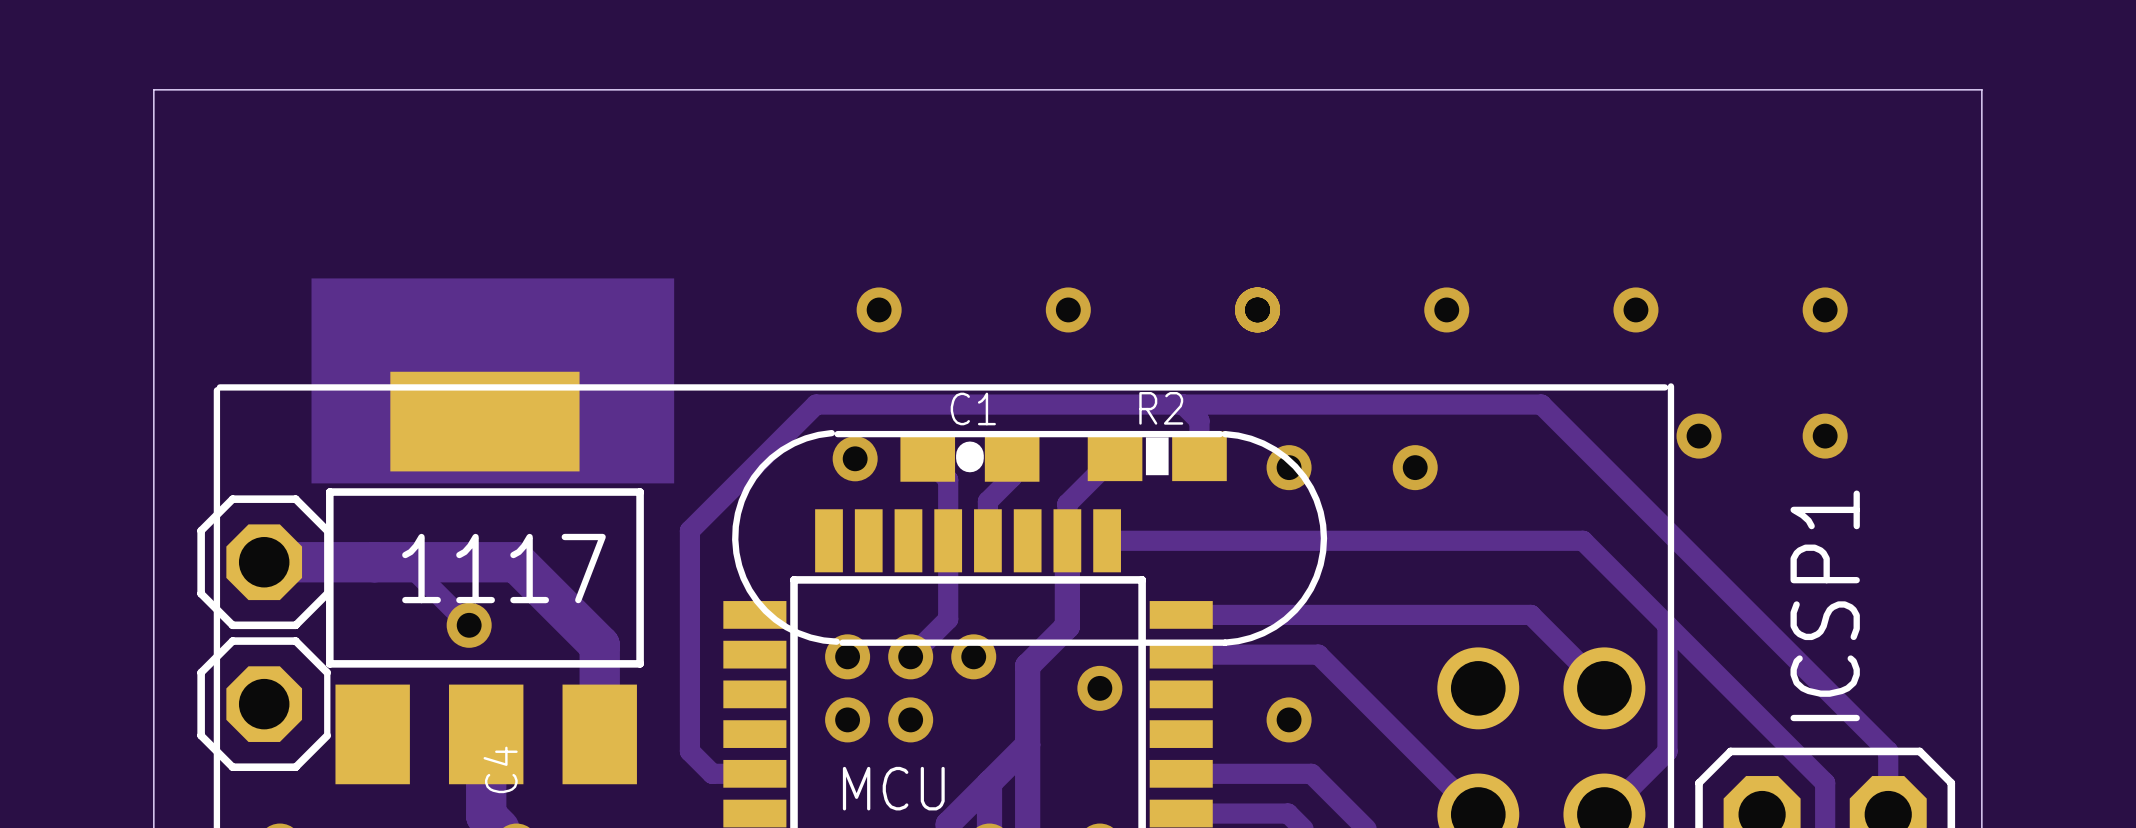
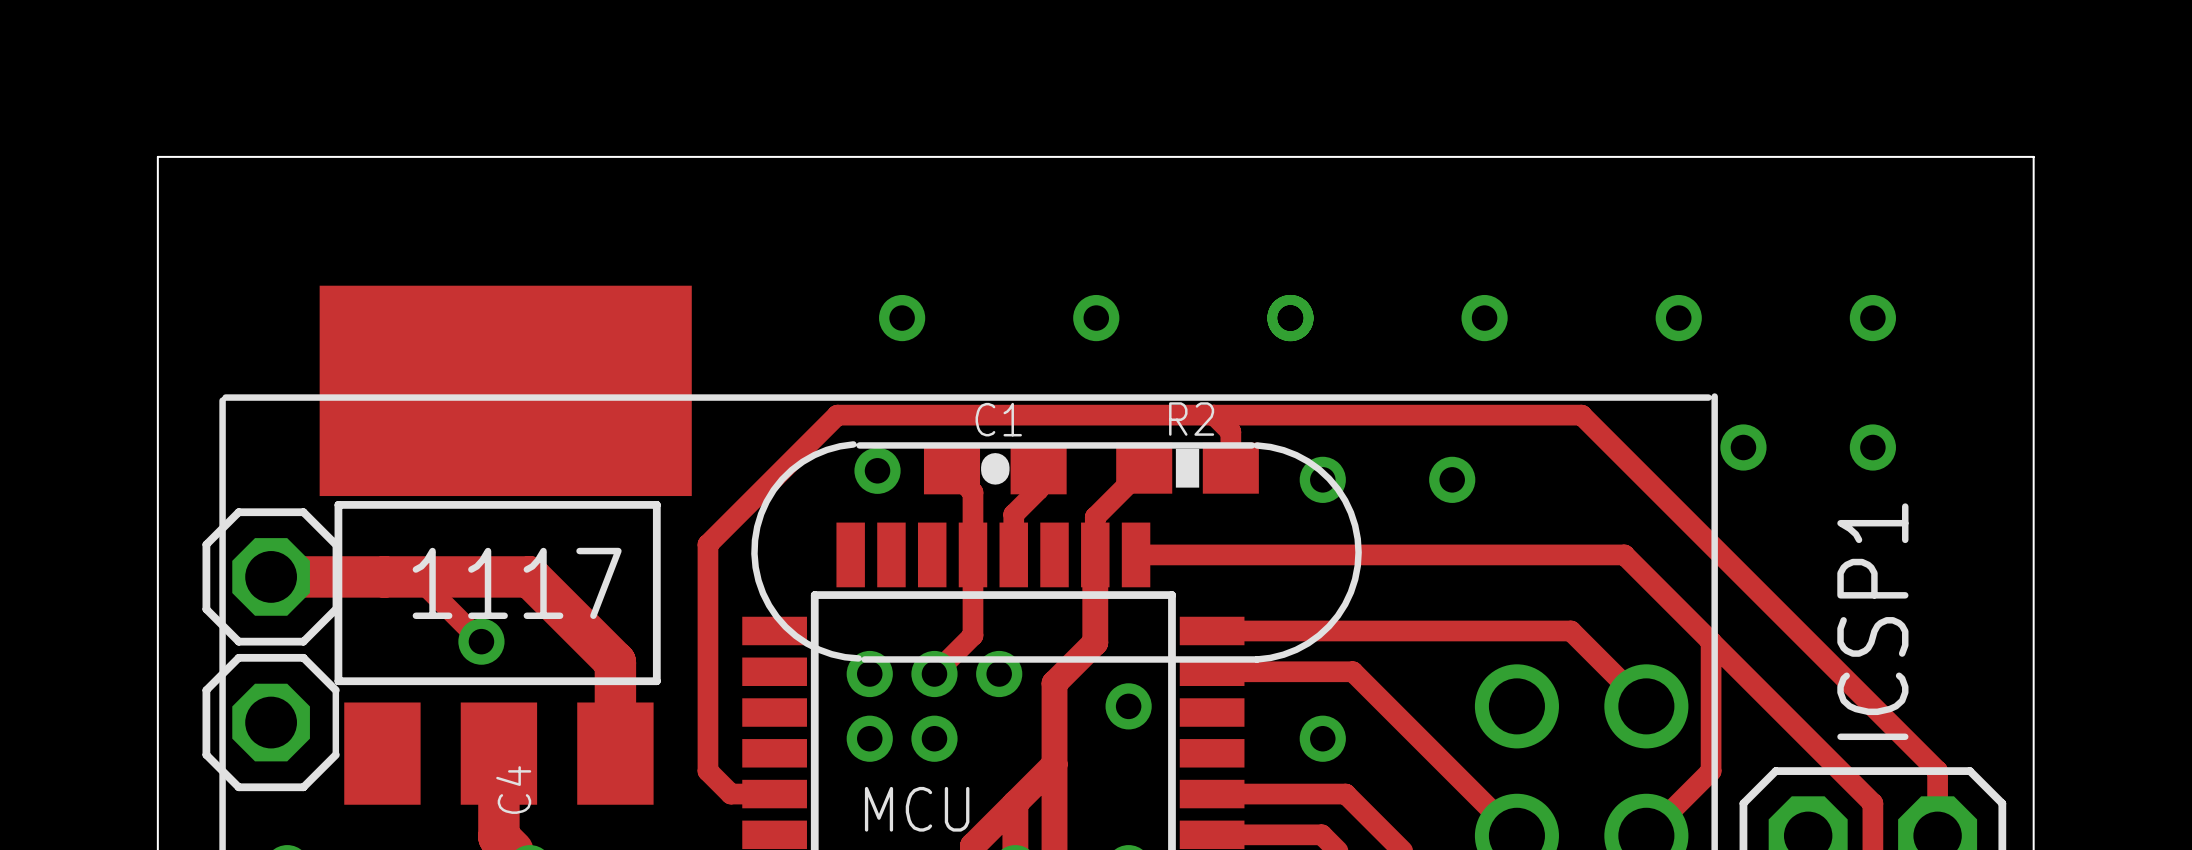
board edge: (153, 152) (153, 89) (1981, 89) (1981, 152) -> (157, 156) (2033, 156)

